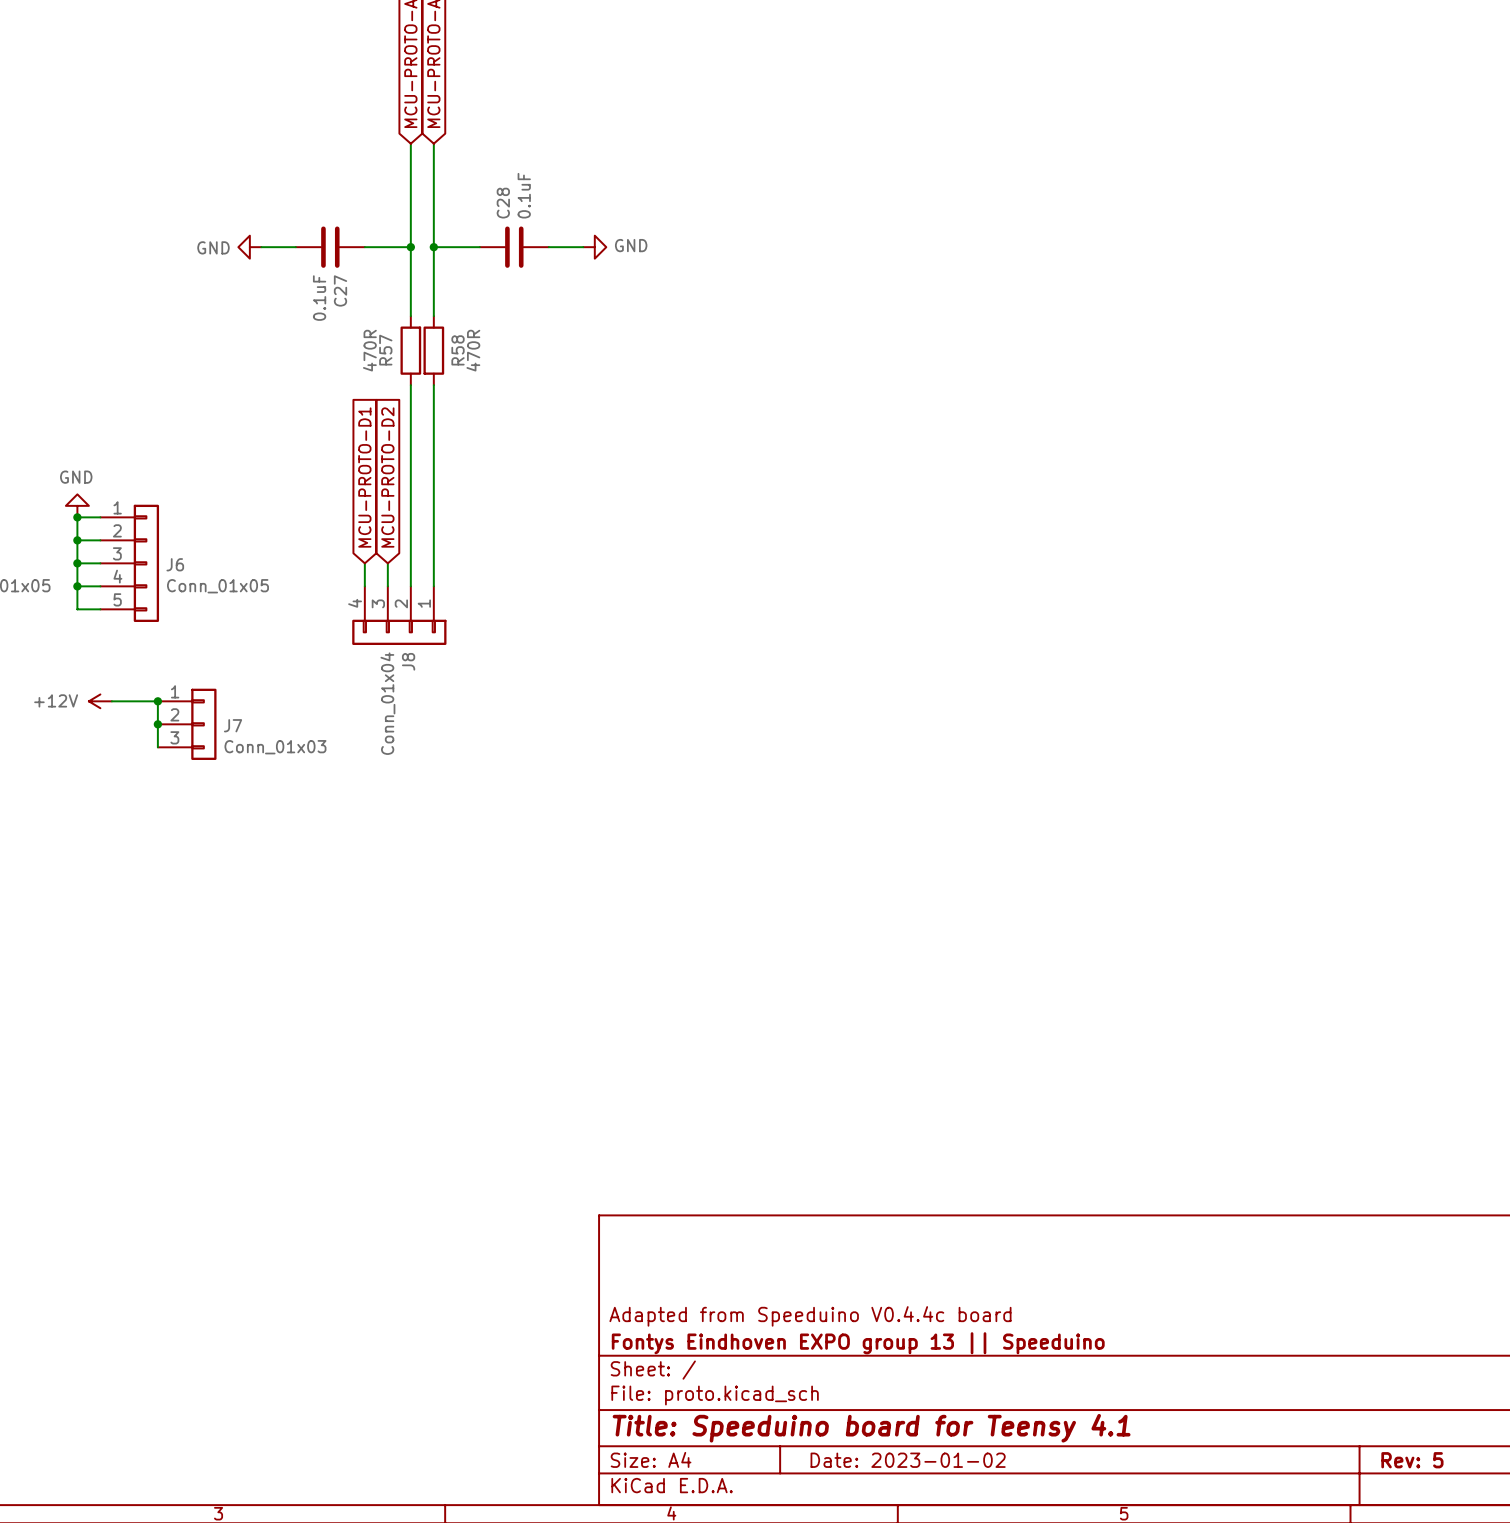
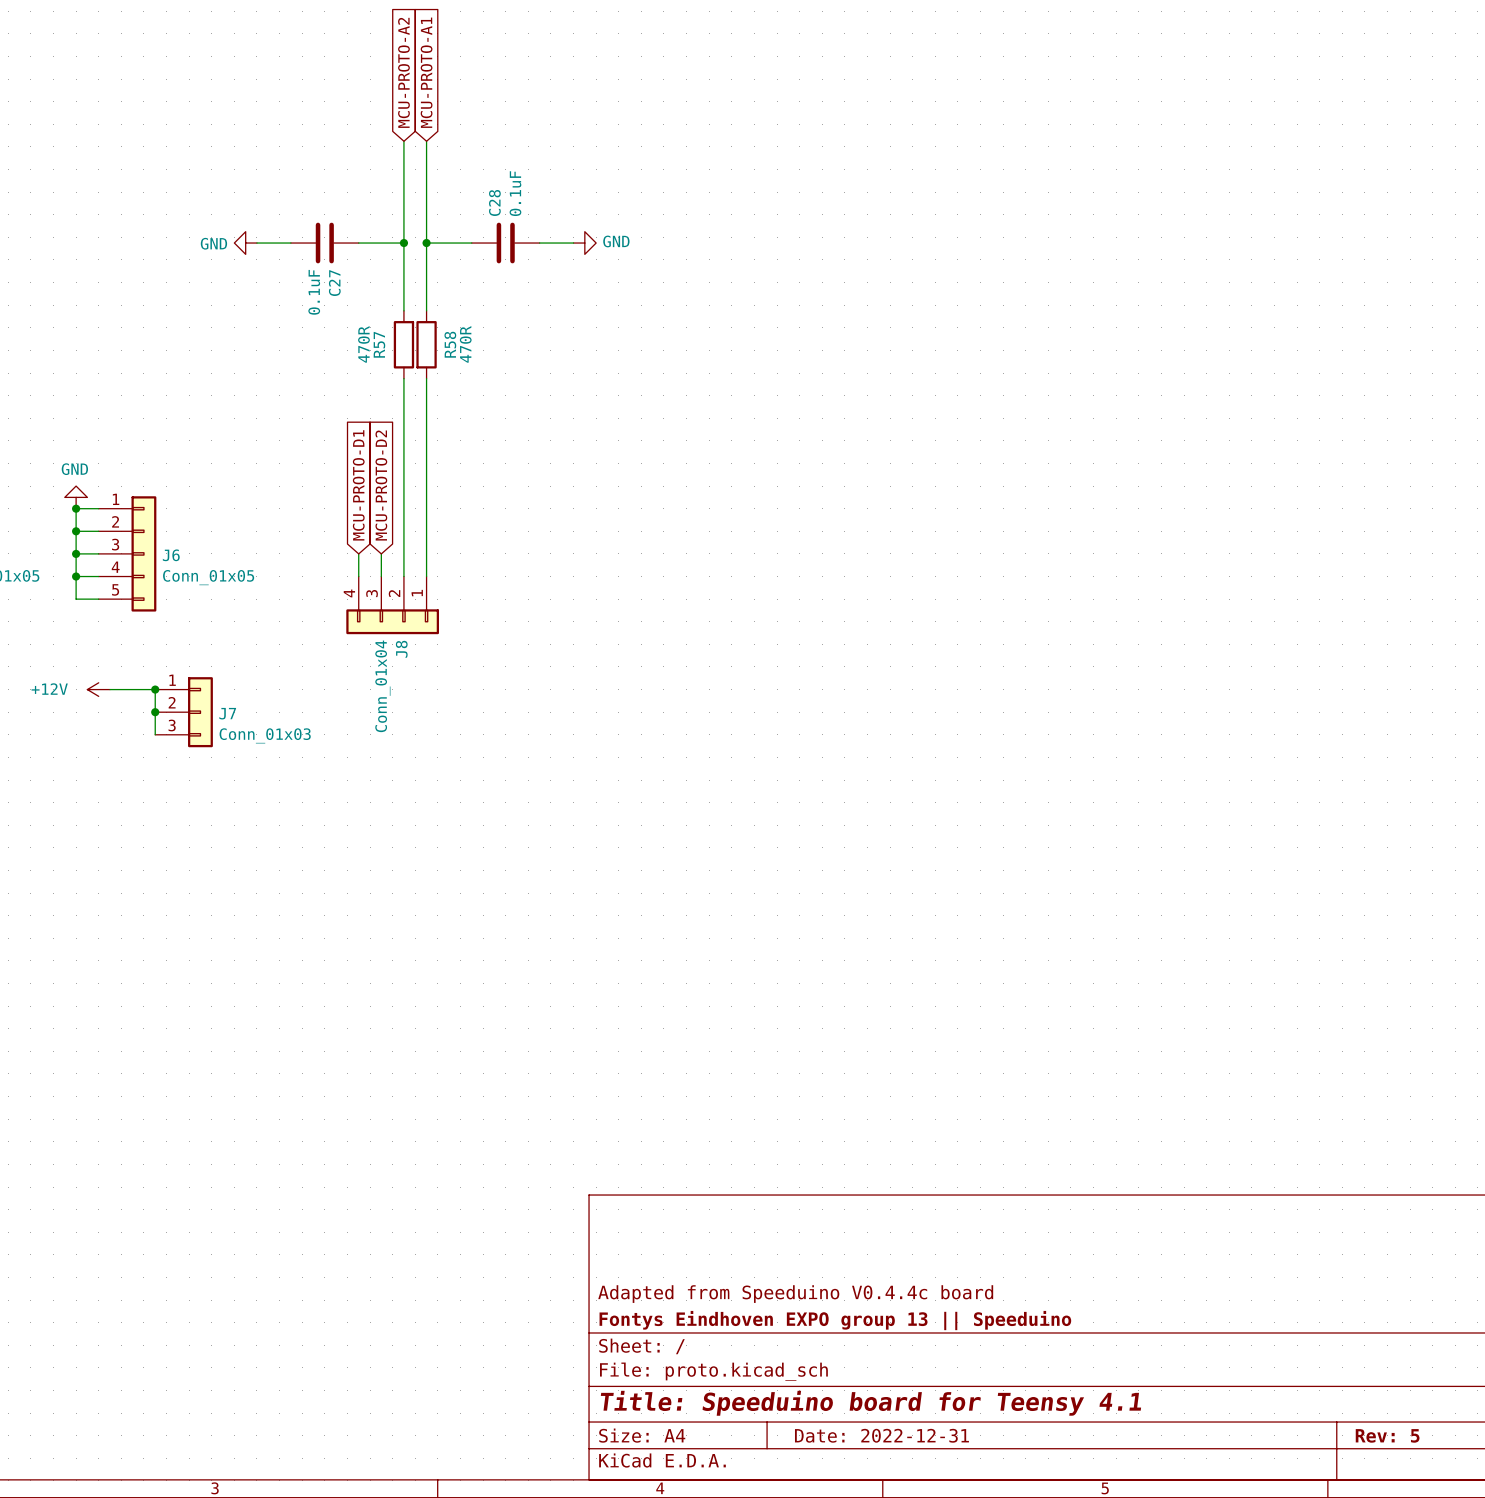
title block: Date: 2023-01-02 (908, 1460) -> Date: 2022-12-31 (881, 1435)

